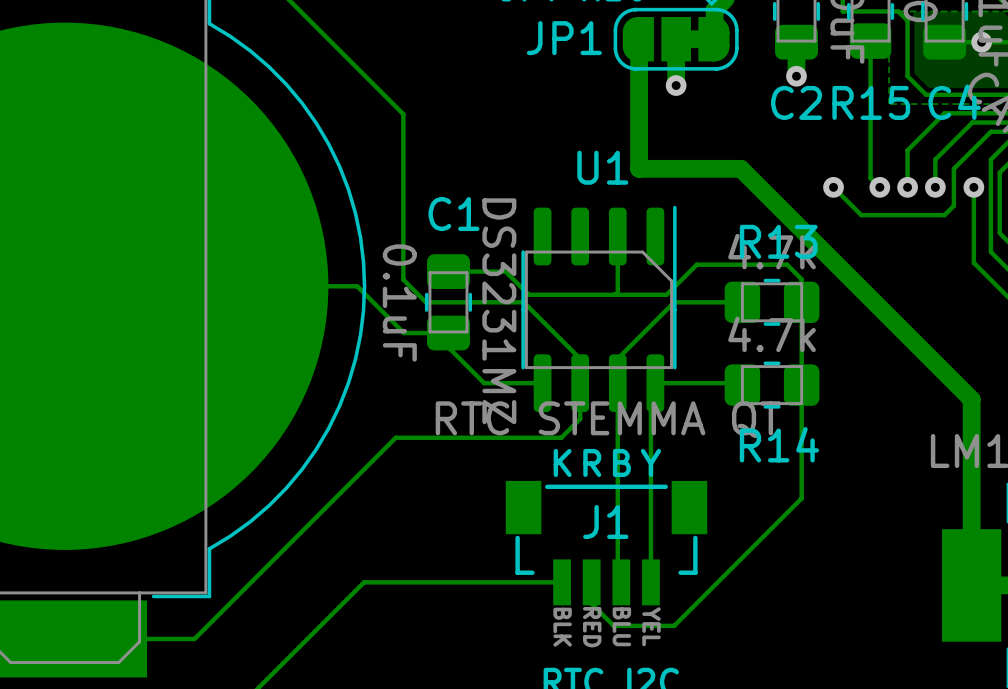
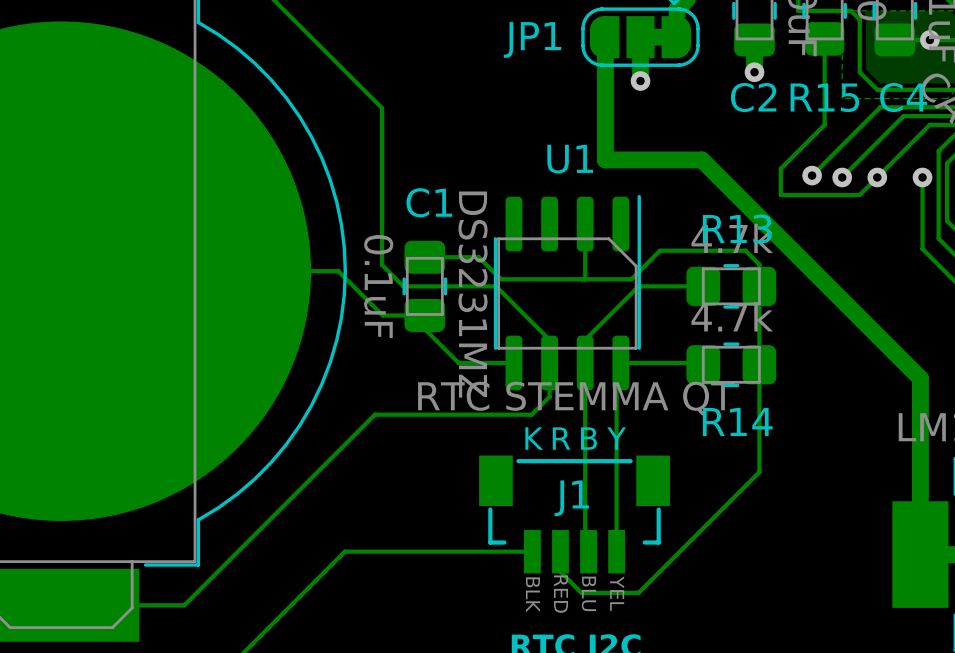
track: (944, 113) (907, 150) (907, 187) -> (894, 107) (880, 107) (812, 175)
track: (972, 122) (935, 159) (935, 187) -> (921, 116) (903, 116) (842, 177)
track: (870, 131) (870, 178) (879, 187) -> none
track: (990, 131) (953, 168) (953, 205) (944, 215) (861, 215) (833, 187) -> (938, 124) (929, 124) (859, 195) (780, 195) (780, 168) (824, 124)
via: none -> (812, 175)
via: (833, 187) -> none
via: (879, 187) -> none
via: none -> (842, 177)
via: (907, 187) -> none
via: none -> (877, 177)
via: (935, 187) -> none

